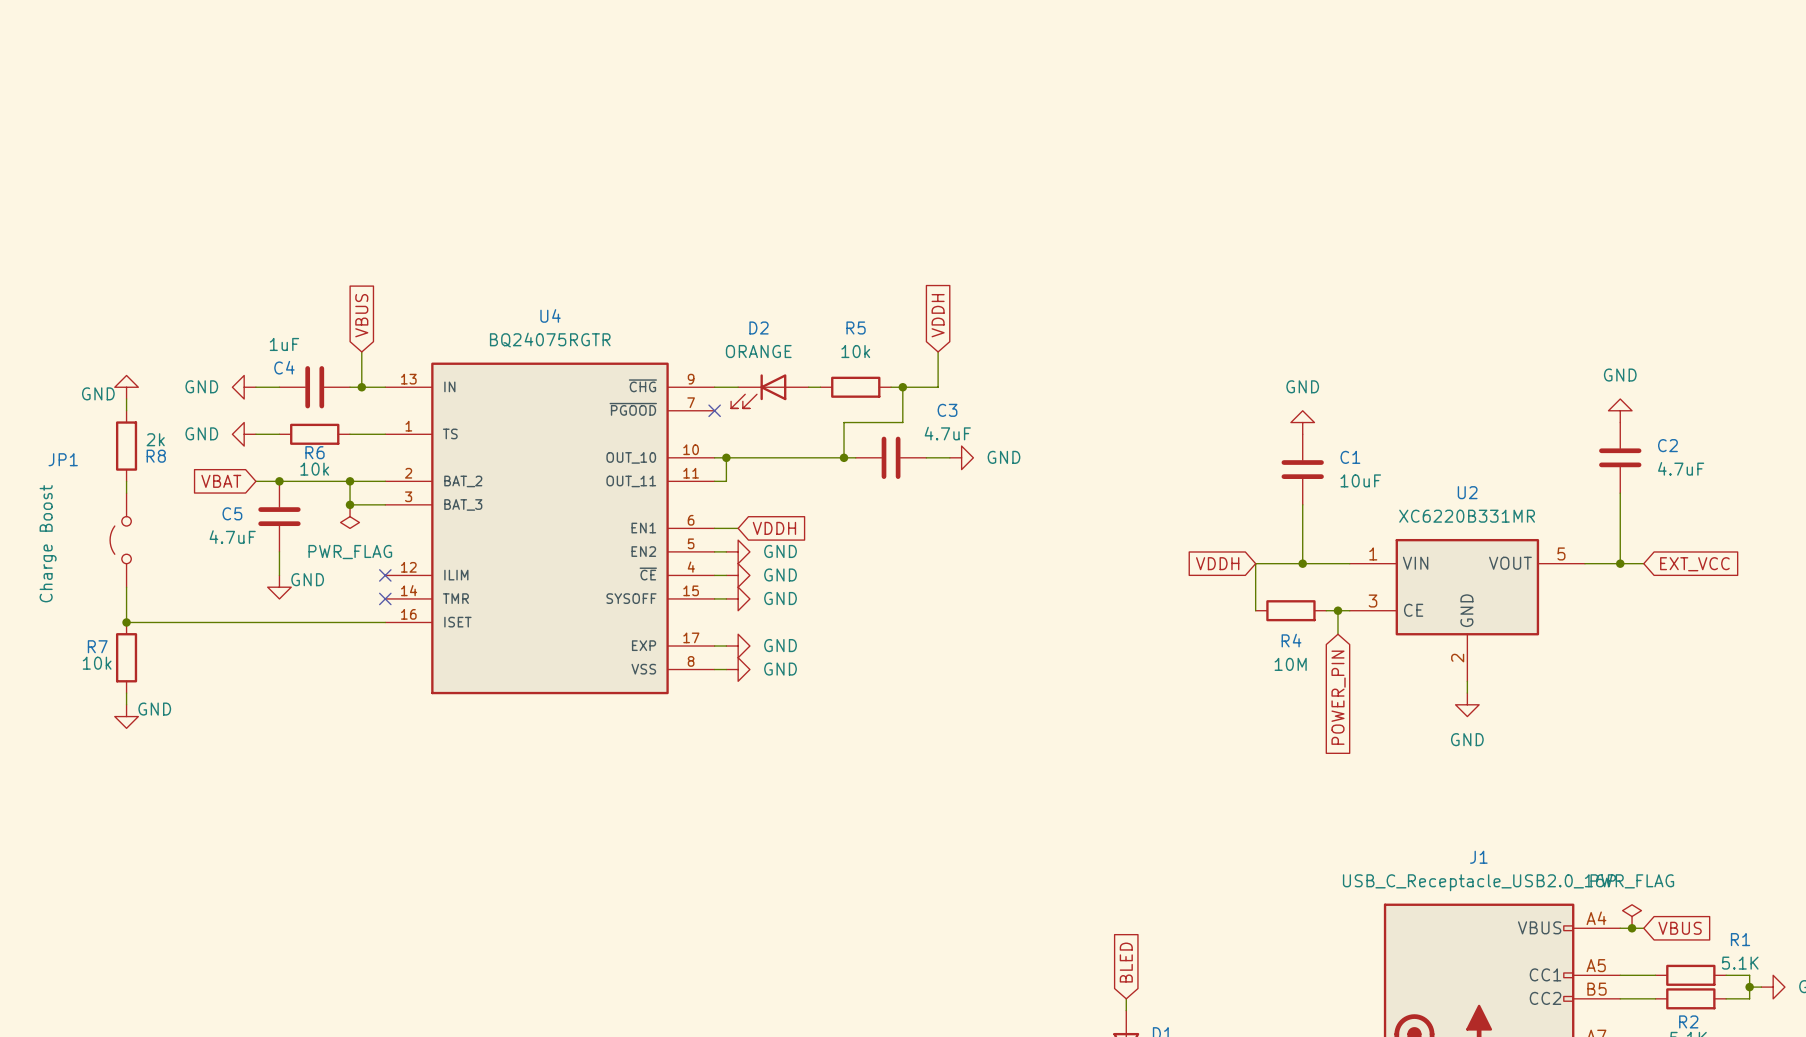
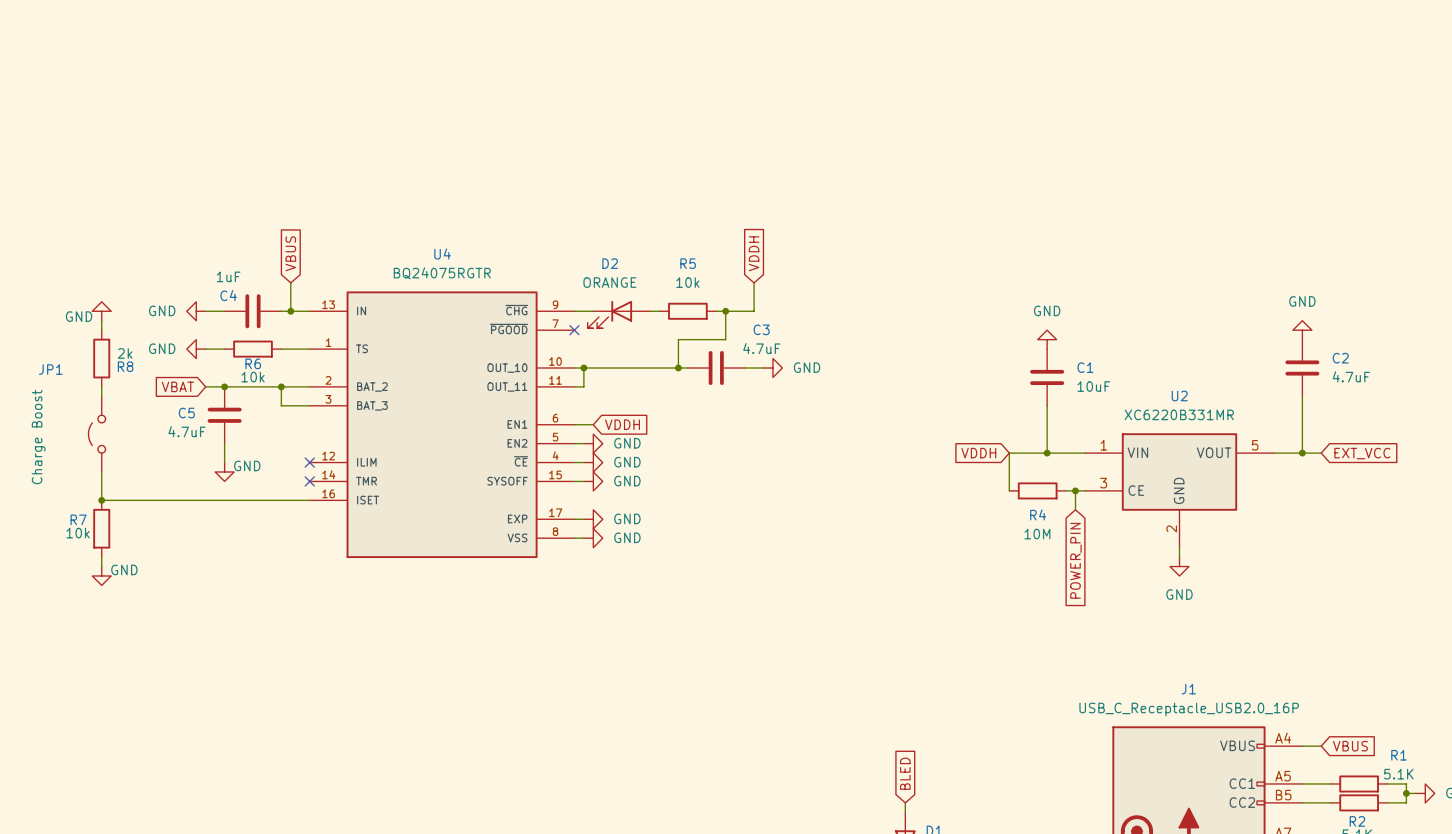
junction: (350, 504) -> none
power symbol: PWR_FLAG (350, 516) -> none
power symbol: PWR_FLAG (1632, 916) -> none
junction: (1632, 928) -> none

